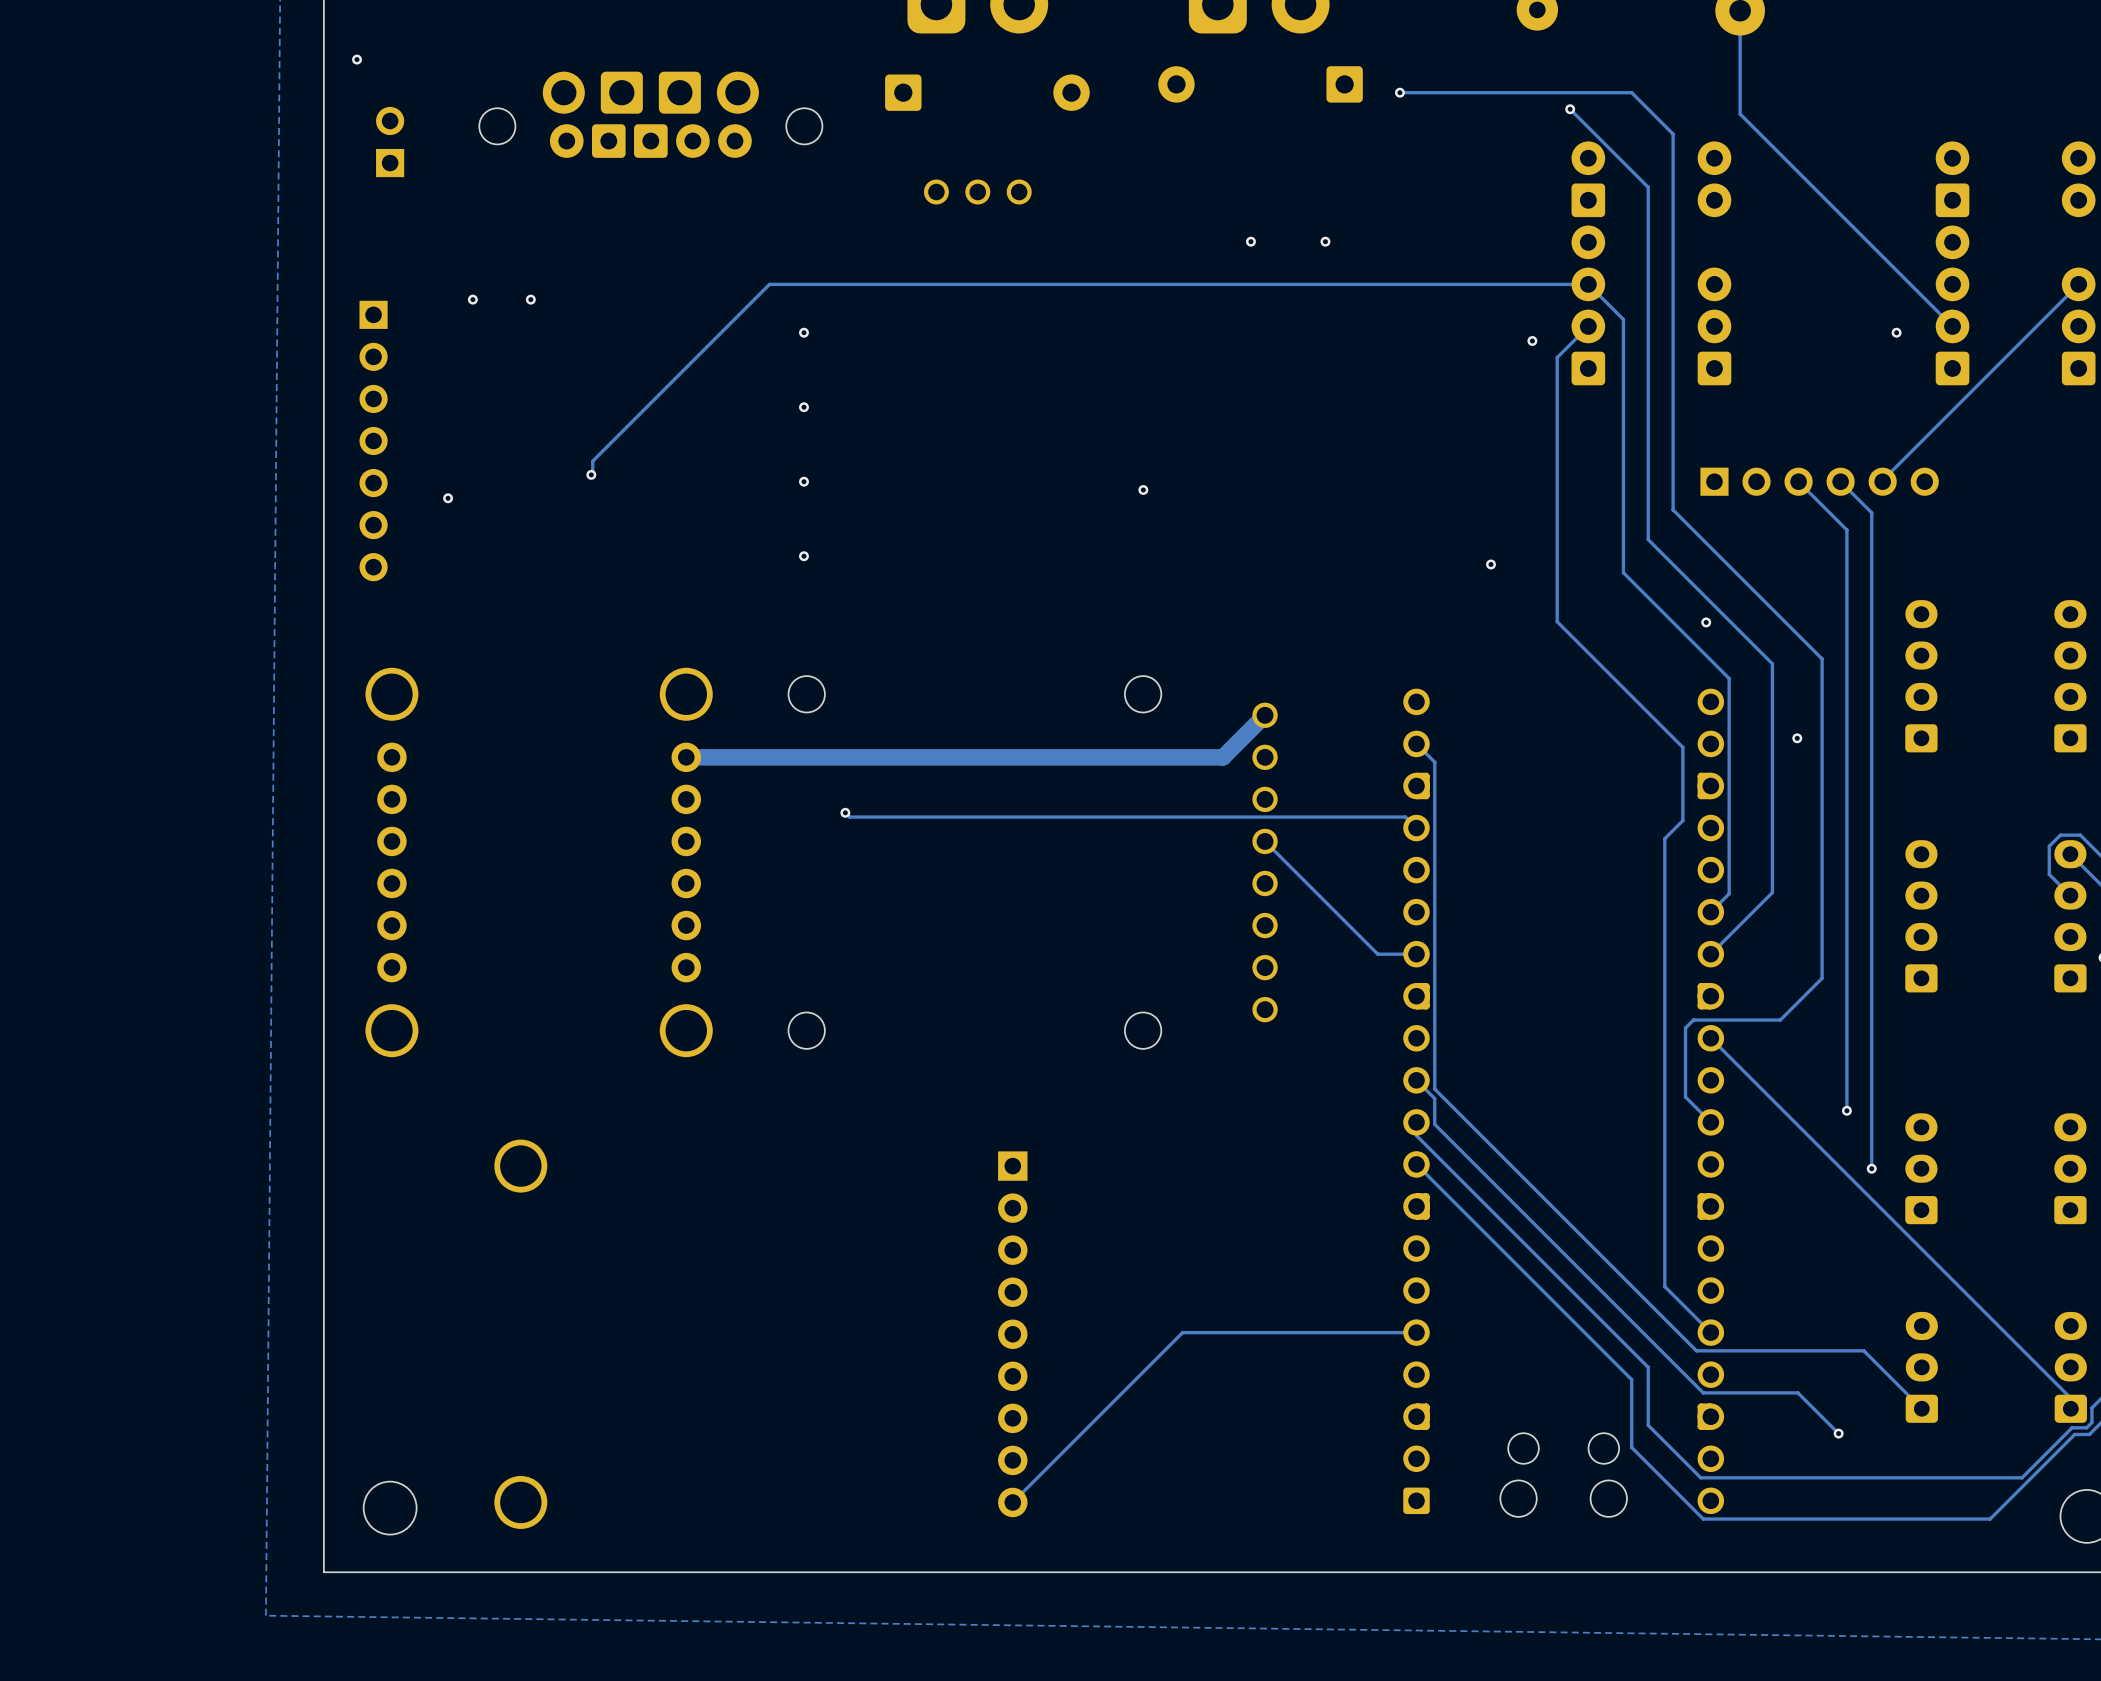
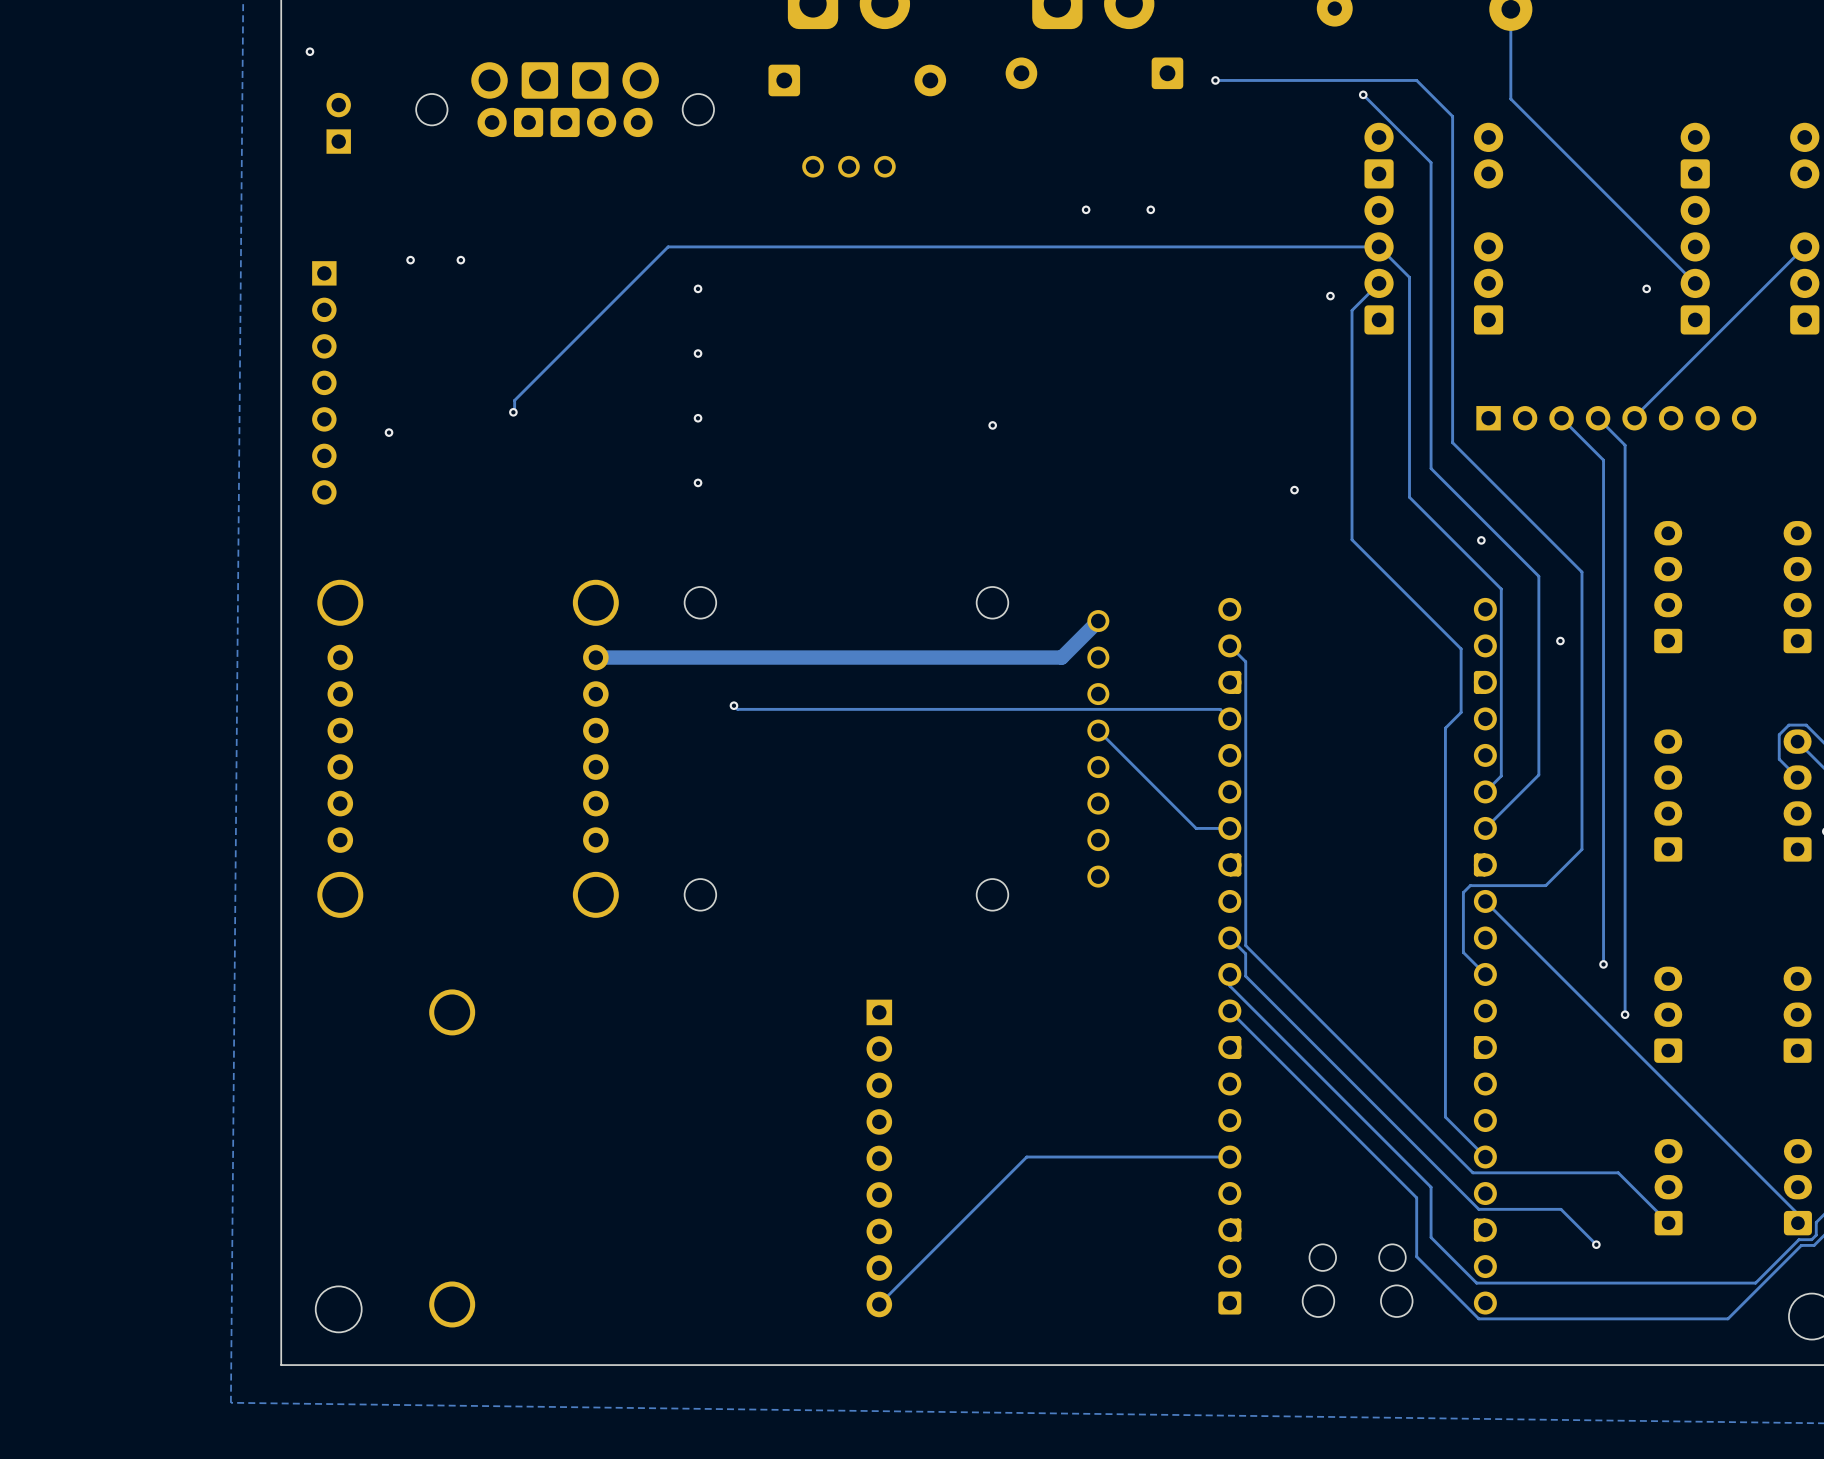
part: none -> (1616, 418)

